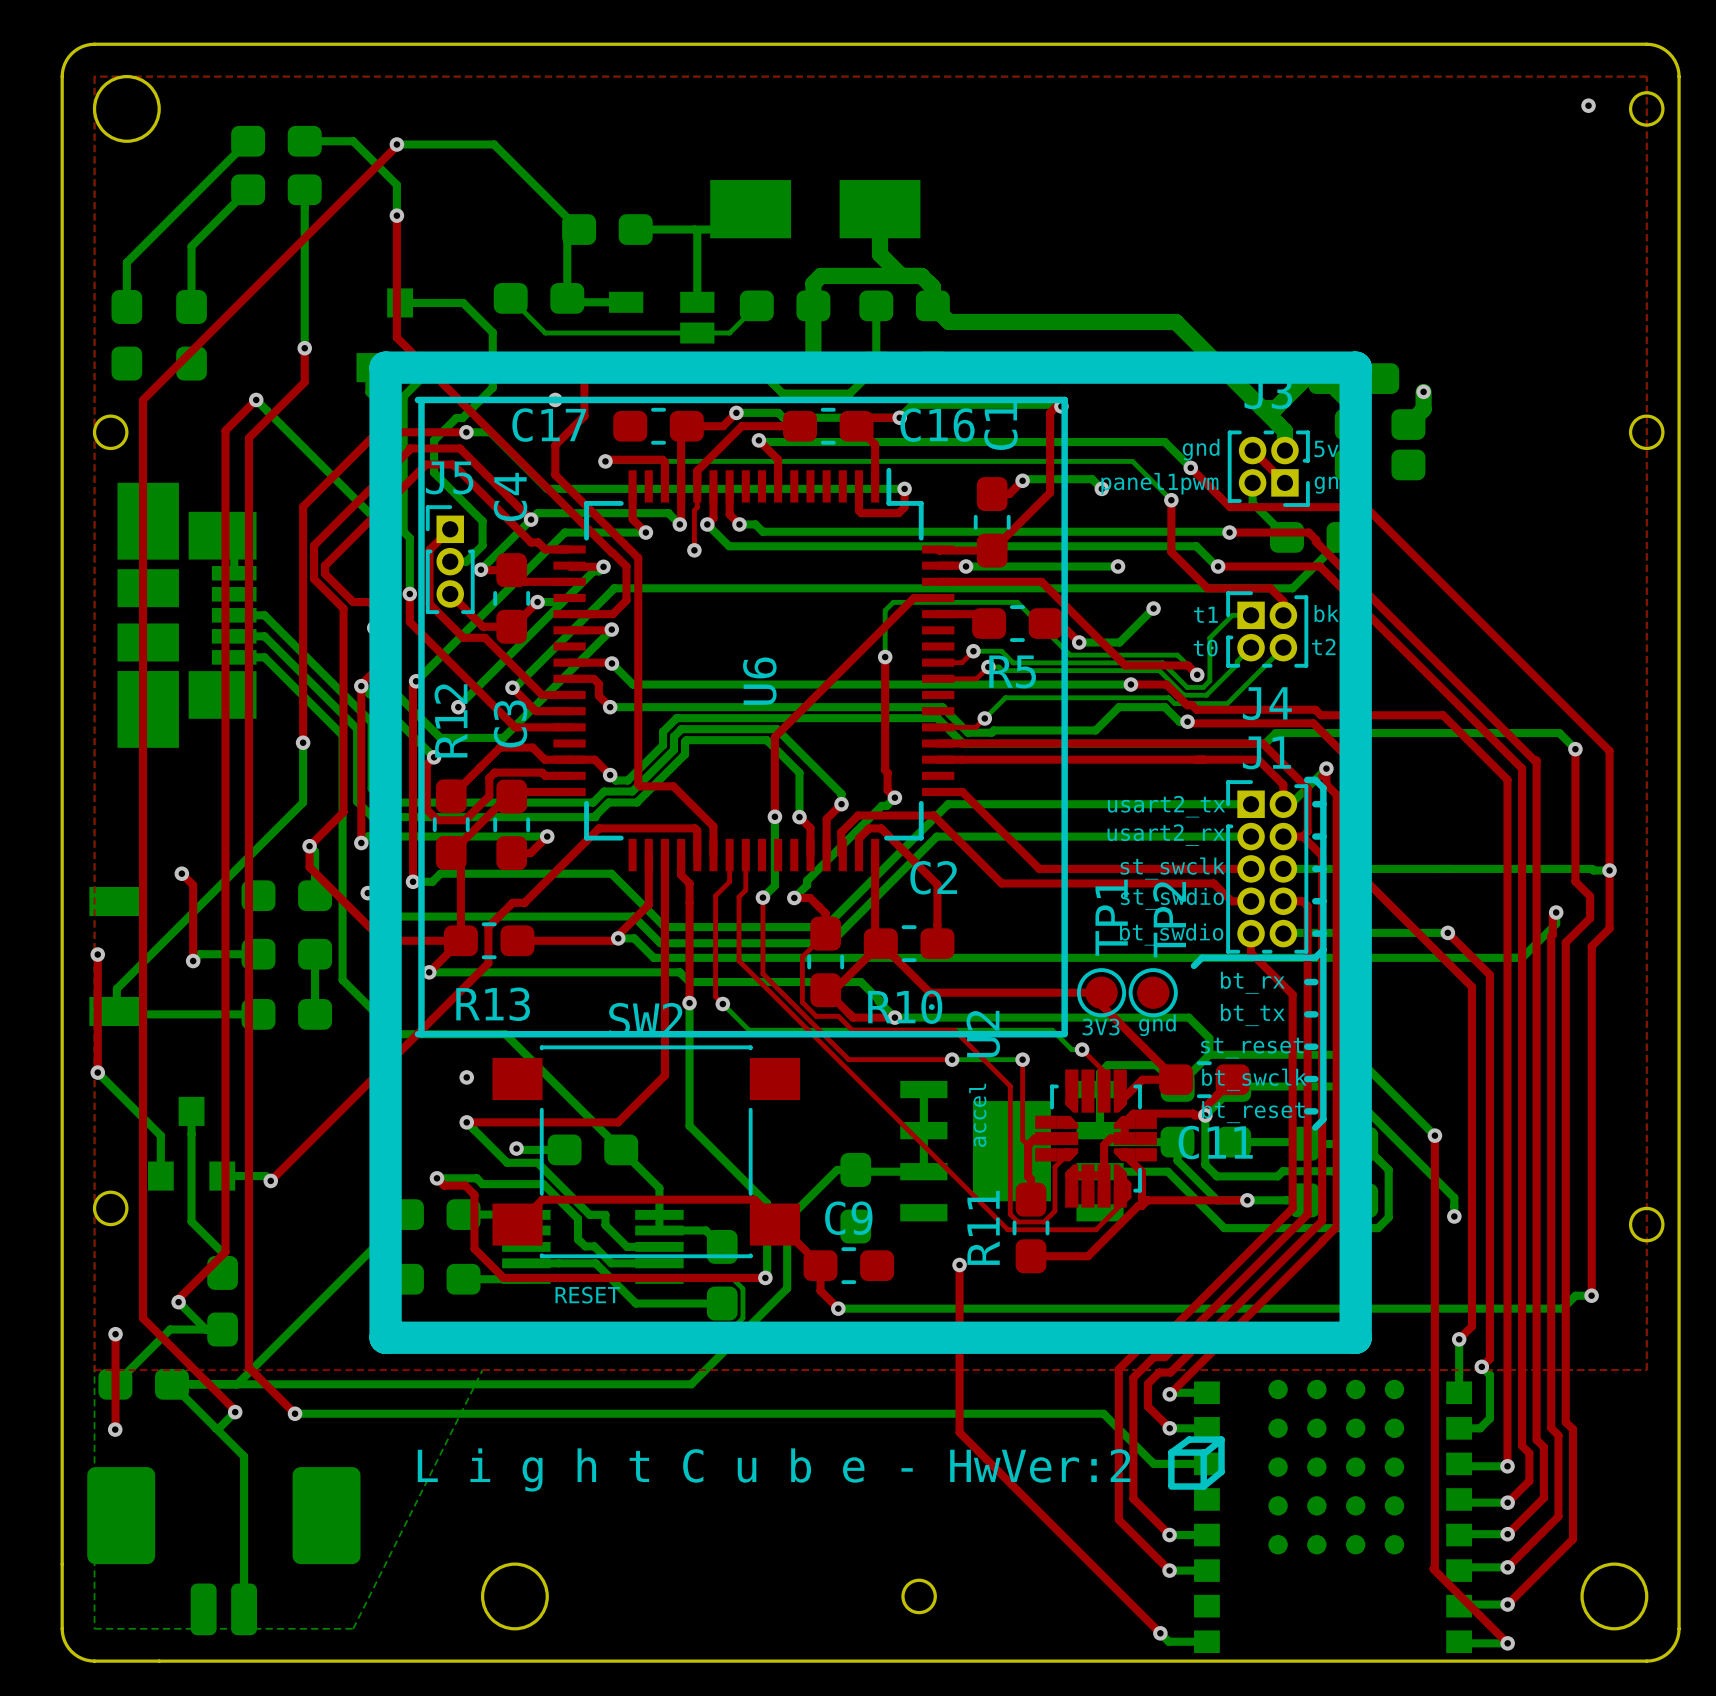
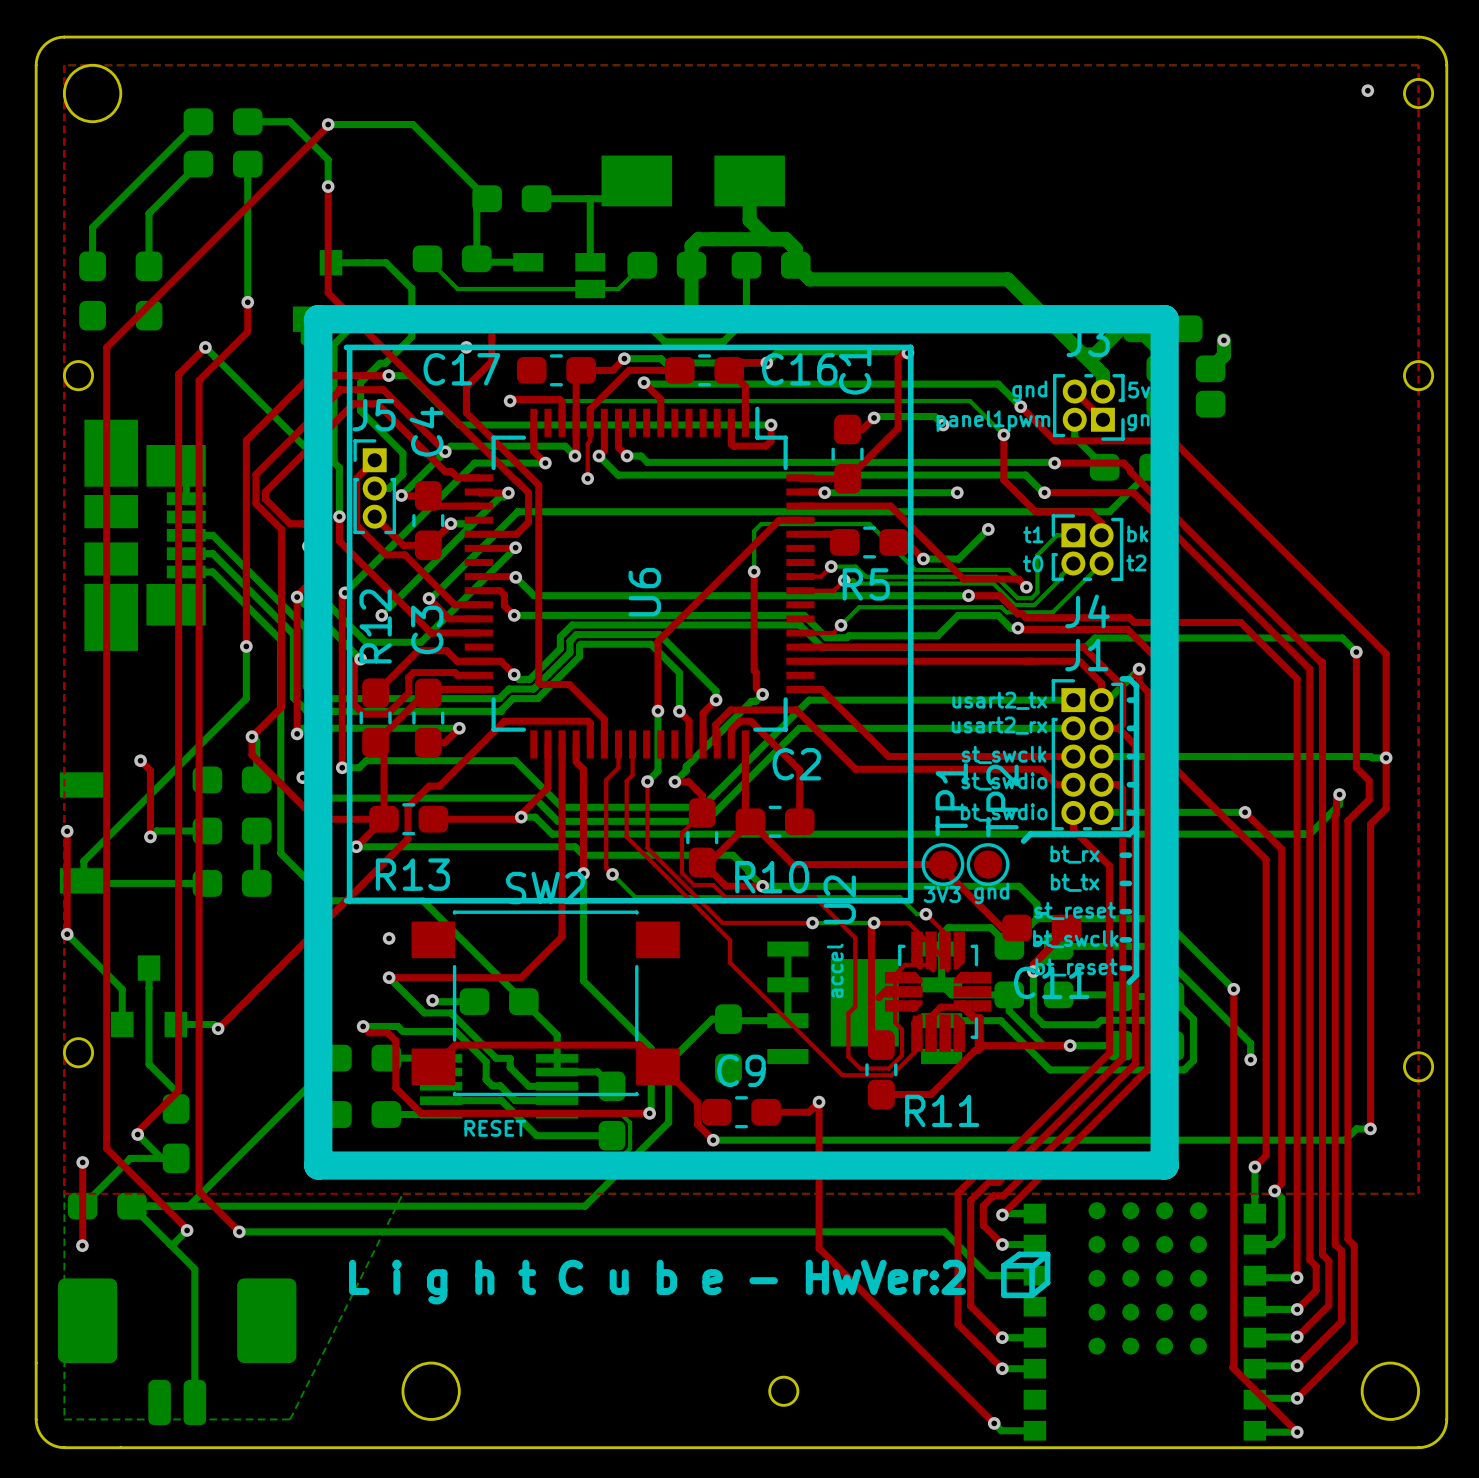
top track: none -> (942, 868) (1002, 928) (1017, 928)
top track: (1101, 1005) (1176, 1079) (1142, 1079) (1120, 1101) -> none
top track: (1022, 1059) (1022, 1139) (1028, 1145) (1028, 1176) (1031, 1179) (1031, 1199) -> none
top track: (1001, 1076) (1010, 1086) (1010, 1214) (1017, 1221) (1044, 1221) -> (855, 938) (855, 1006) (848, 1013) (848, 1056) (860, 1068) (888, 1068) (892, 1064)
top track: (857, 1079) (1007, 1229) (1096, 1229) (1129, 1196) (1129, 1184) (1120, 1175) -> (730, 940) (730, 962) (842, 1075) (891, 1075) (914, 1052) (914, 1017)
C11 position: (1204, 1079) -> (1041, 928)
top track: none -> (947, 970) (947, 961) (908, 922) (874, 922) (871, 925) (871, 1049)
top track: (1205, 1115) (1133, 1113) (1124, 1122) (1124, 1138) (1110, 1138) (1104, 1145) (1104, 1175) (1071, 1175) -> none
top track: (1067, 1154) (1054, 1167) (1054, 1211) -> (933, 970) (927, 964) (905, 964) (895, 974) (895, 1022) (902, 1029) (902, 1055)
top track: none -> (933, 1022) (933, 1014) (940, 1007) (962, 1007) (972, 1017) (980, 1017) (980, 1042) (982, 1045)
R11 name rotation: 0° (983, 1227) -> 90° clockwise (942, 1110)
R11 name position: R11 (983, 1227) -> R11 (942, 1110)
top track: none -> (819, 1102) (808, 1112) (766, 1112)
C9 position: (848, 1265) -> (741, 1112)

